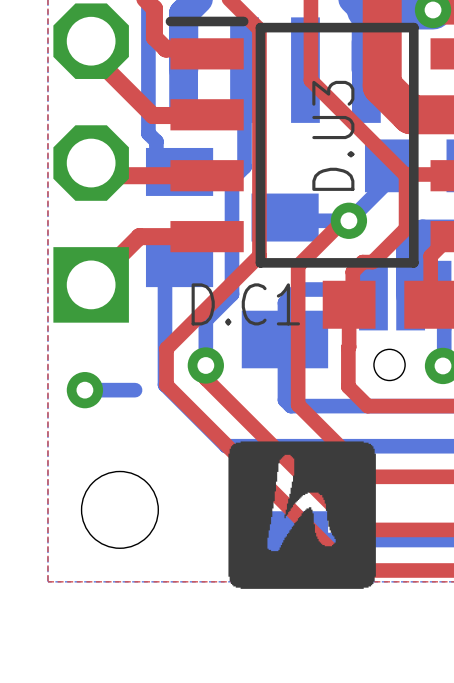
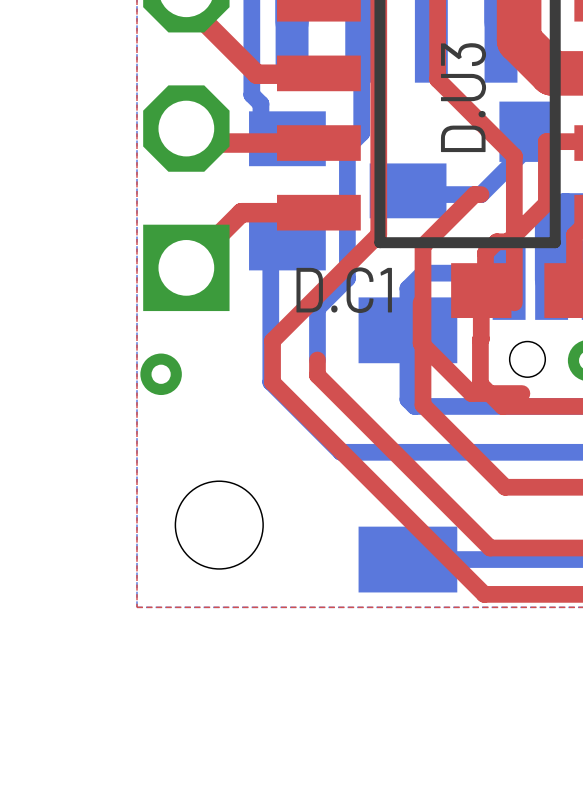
top track: (310, 80) (405, 174) -> (437, 34) (437, 79) (514, 156) (514, 302)
via: (348, 220) -> none
top track: none -> (421, 302) (421, 343) (471, 393) (521, 393)
via: (205, 365) -> none
bottom track: (84, 390) (135, 390) -> none
via position: (84, 390) -> (161, 374)
drawing: [228, 441, 376, 589] -> none

